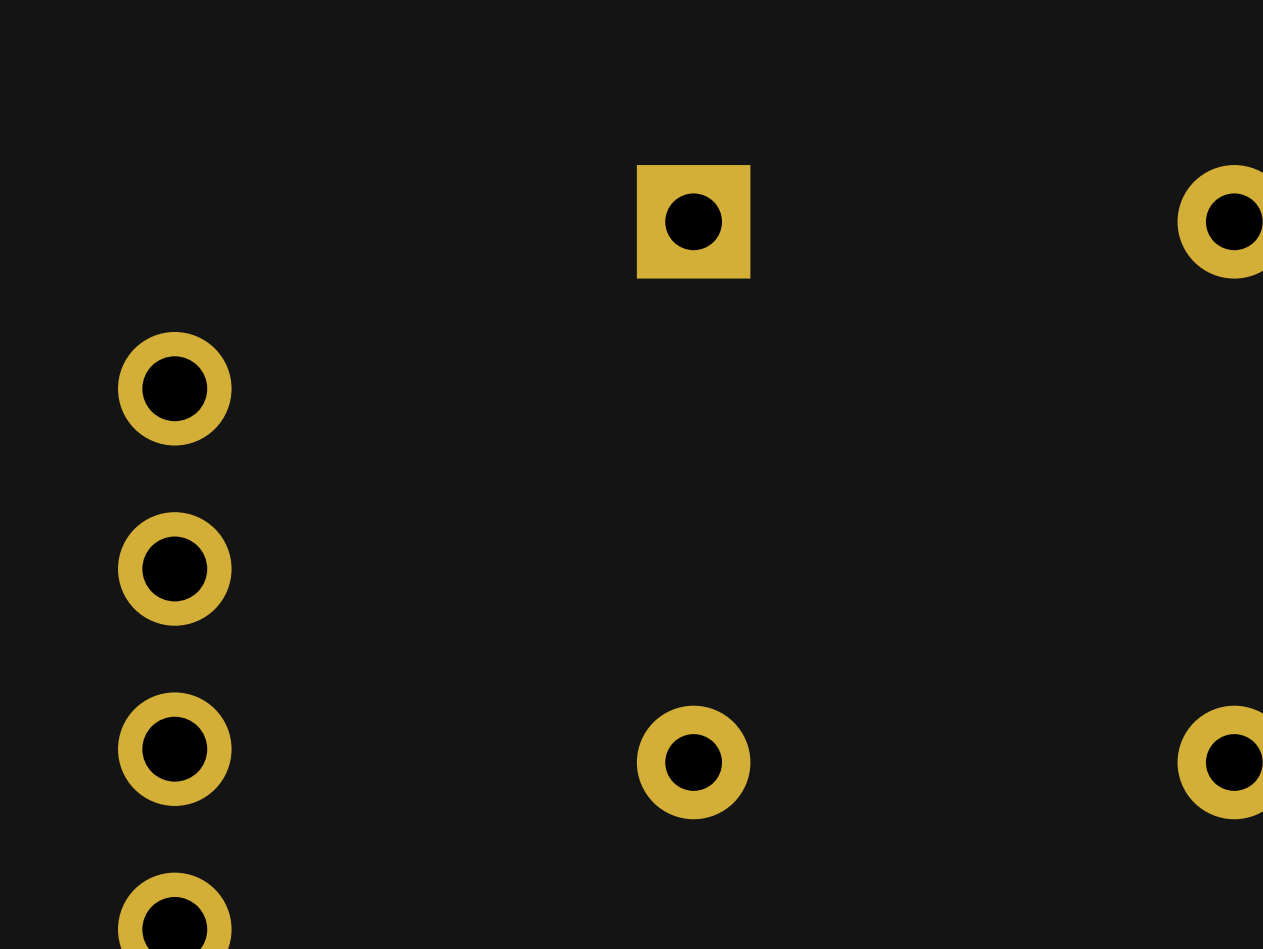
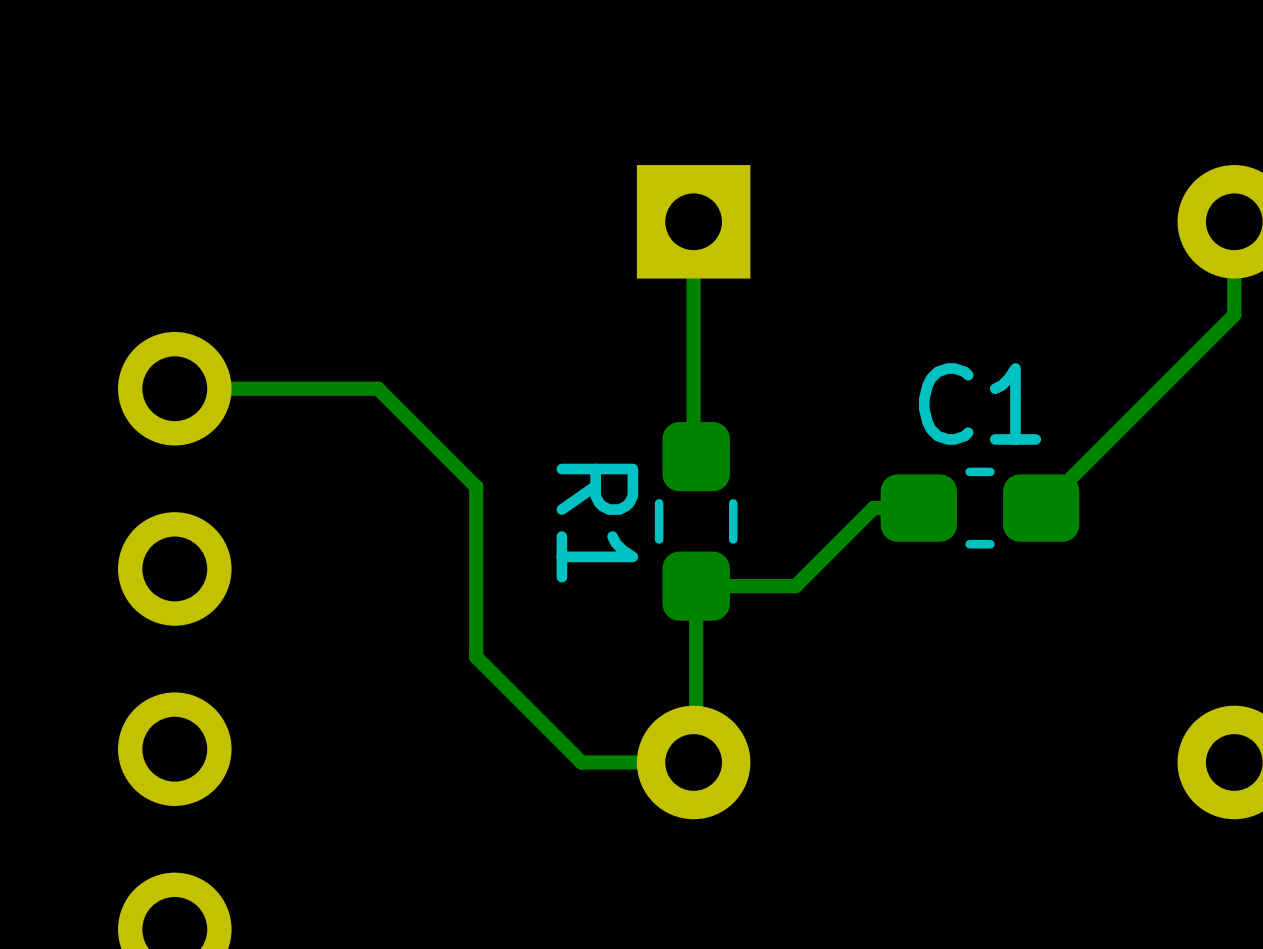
track: none -> (693, 221) (693, 454) (696, 456)
track: none -> (1234, 221) (1234, 314) (1041, 508)
track: none -> (174, 388) (378, 388) (476, 486) (476, 657) (581, 762) (693, 762) (696, 759) (696, 586) (795, 586) (873, 508) (918, 508)
C1: none -> (980, 508)
R1: none -> (696, 521)

